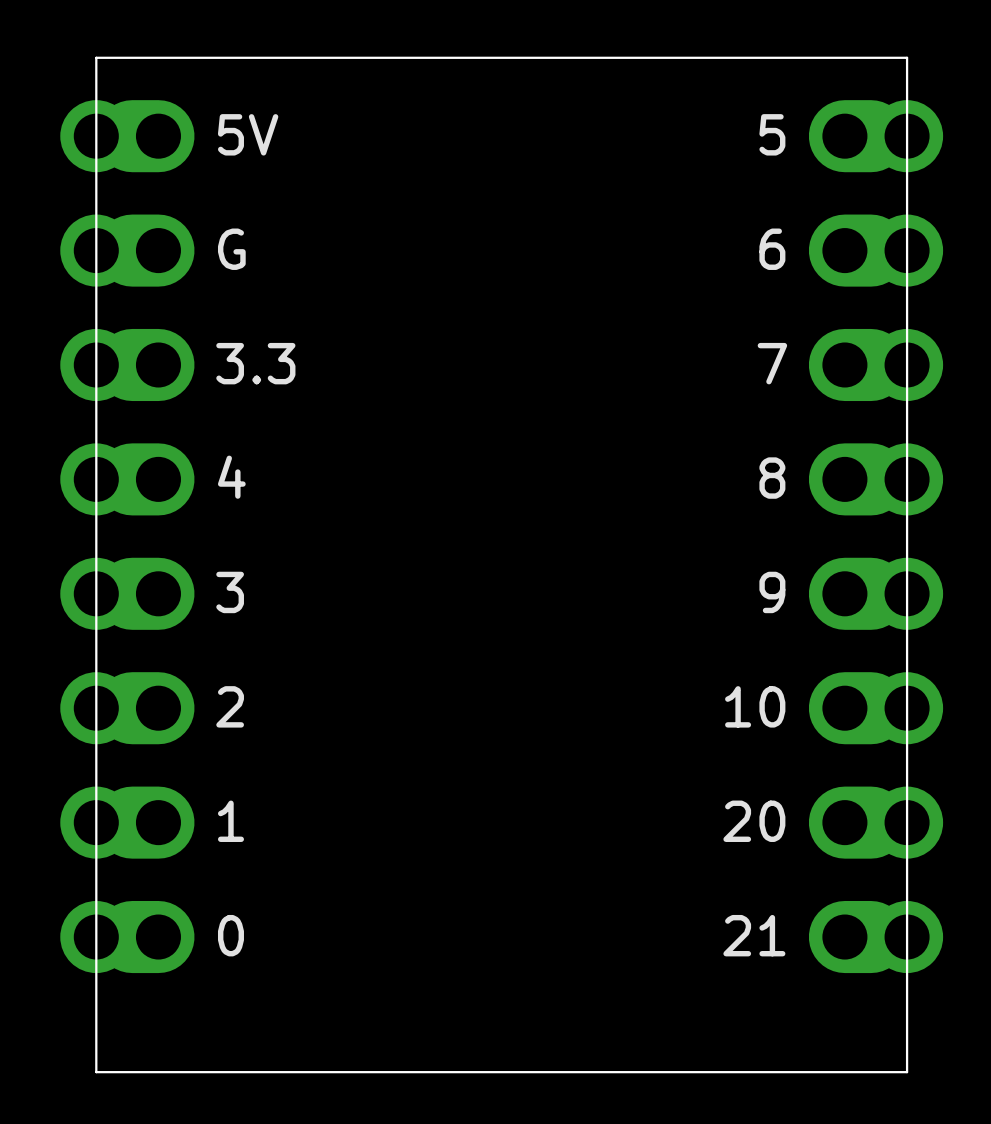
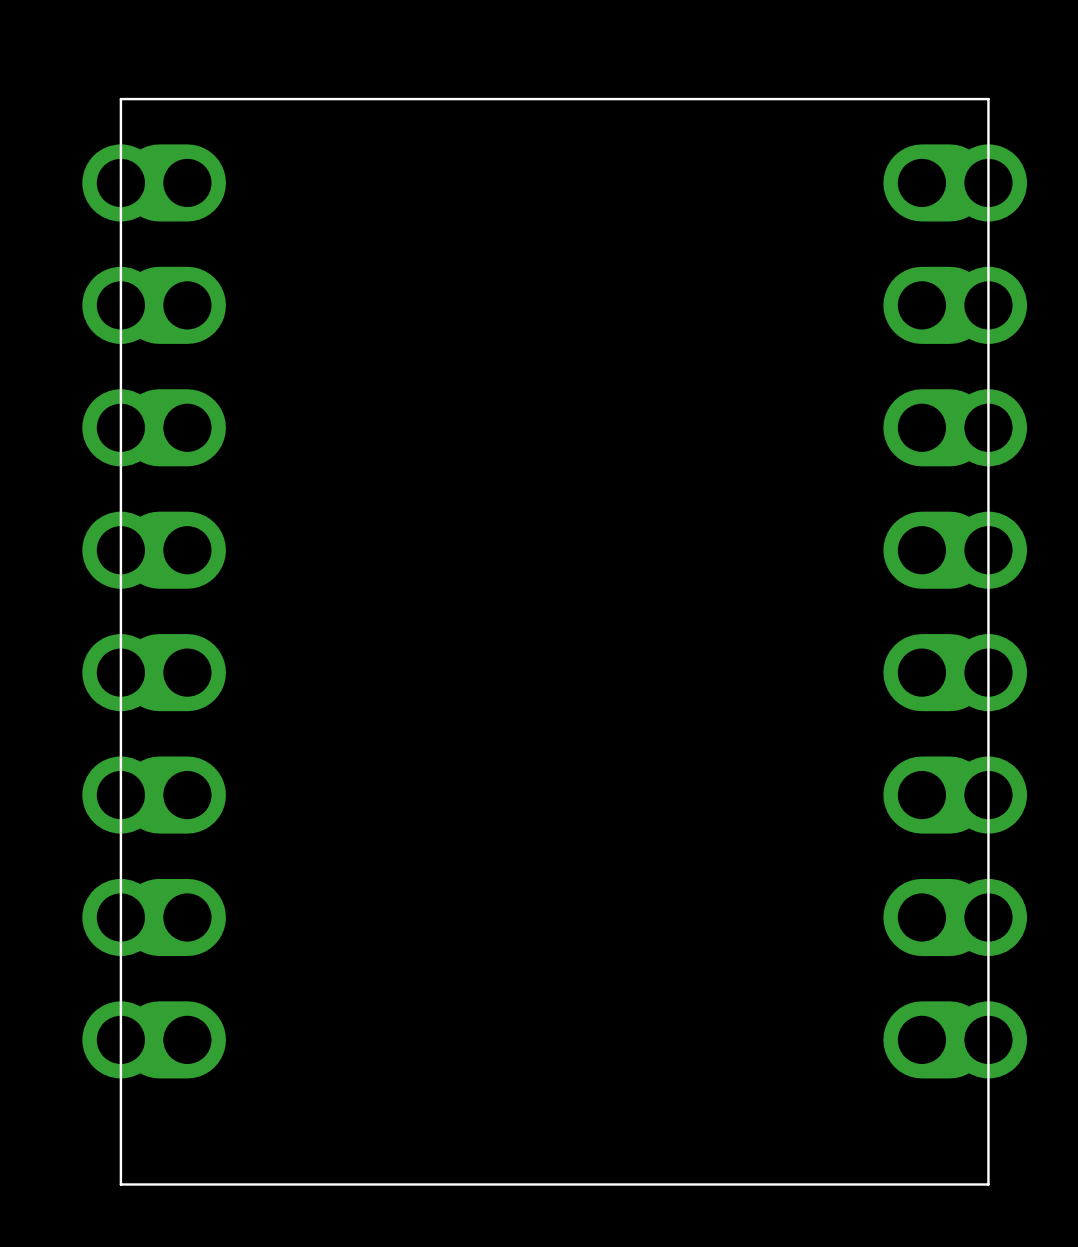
text: 5V (248, 134) -> none
text: 5 (772, 134) -> none
text: G (231, 249) -> none
text: 6 (772, 249) -> none
text: 3.3 (255, 363) -> none
text: 7 (772, 363) -> none
text: 4 (231, 477) -> none
text: 8 (772, 478) -> none
text: 3 (230, 592) -> none
text: 9 (772, 592) -> none
text: 2 (230, 706) -> none
text: 10 (755, 706) -> none
text: 1 (230, 821) -> none
text: 20 (754, 821) -> none
text: 0 (230, 935) -> none
text: 21 (754, 935) -> none

